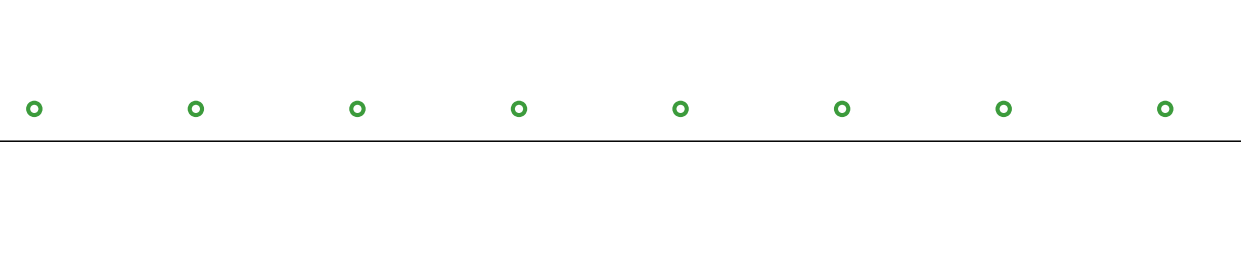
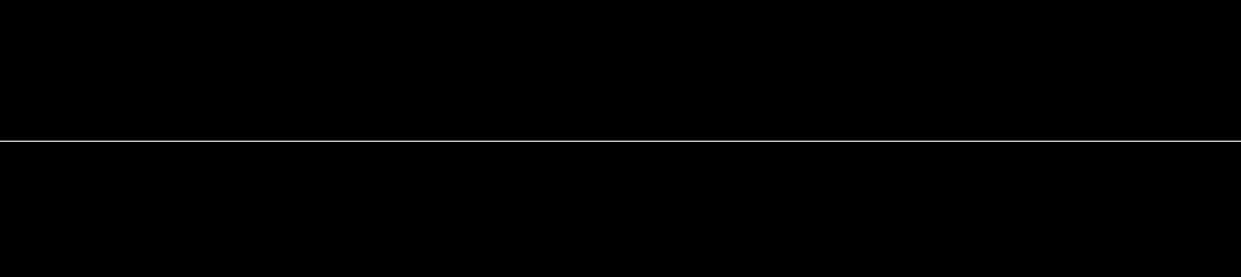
via: (34, 108) -> none
via: (195, 108) -> none
via: (357, 108) -> none
via: (519, 108) -> none
via: (680, 108) -> none
via: (842, 108) -> none
via: (1003, 108) -> none
via: (1165, 108) -> none

